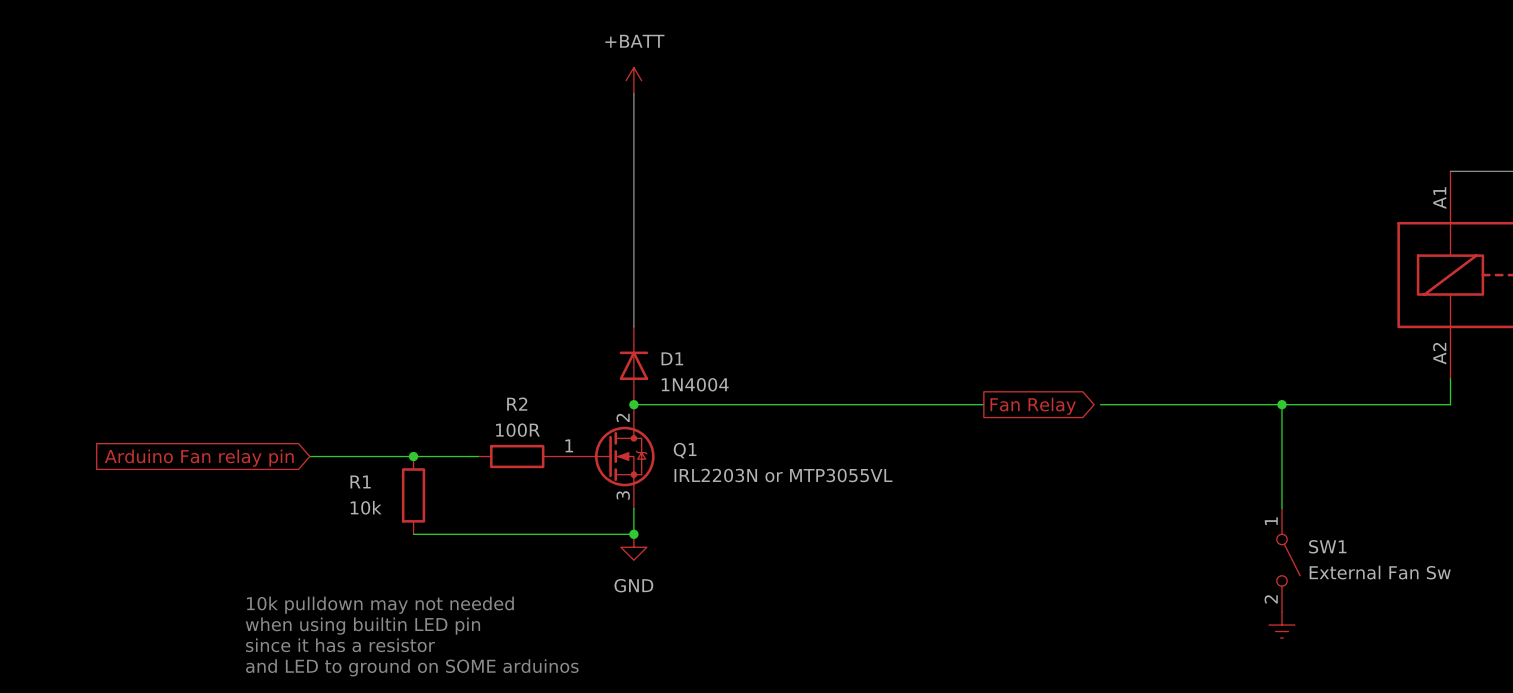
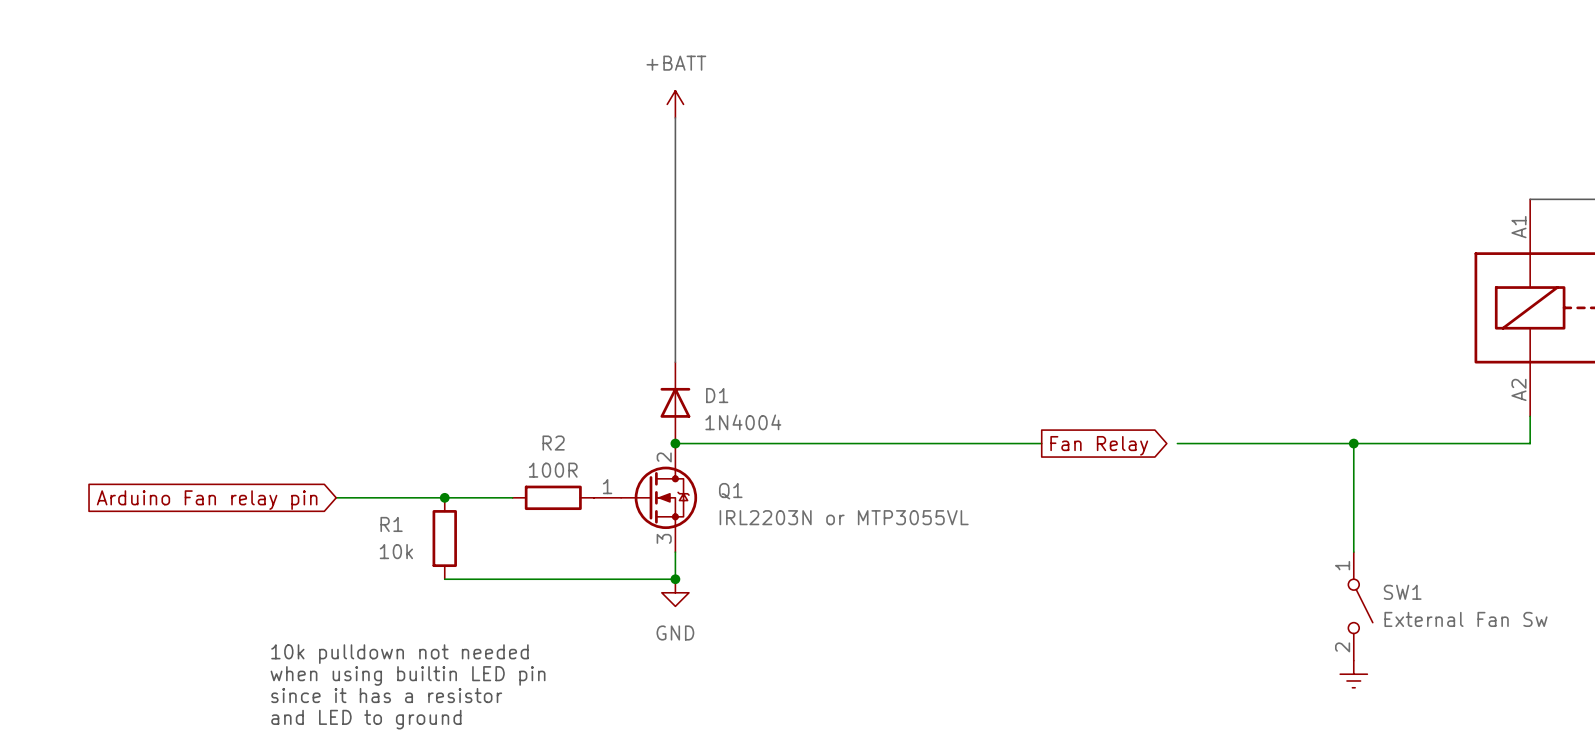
wire: (1100, 404) (1113, 404) -> none
text: 10k pulldown may not needed (380, 605) -> 10k pulldown not needed (399, 654)
text: and LED to ground on SOME arduinos (412, 667) -> and LED to ground (366, 719)

